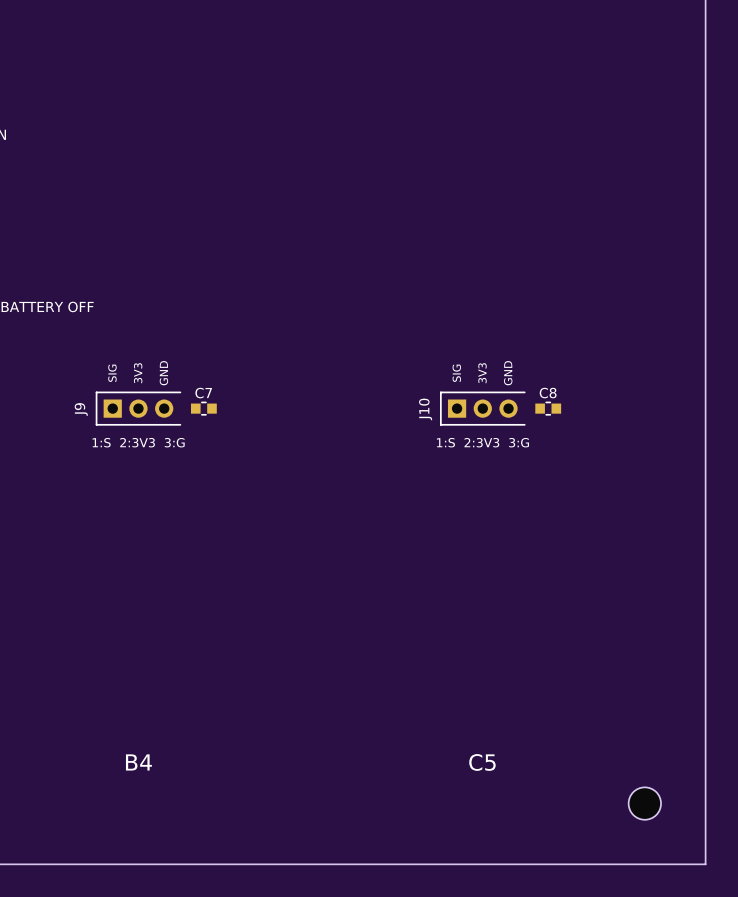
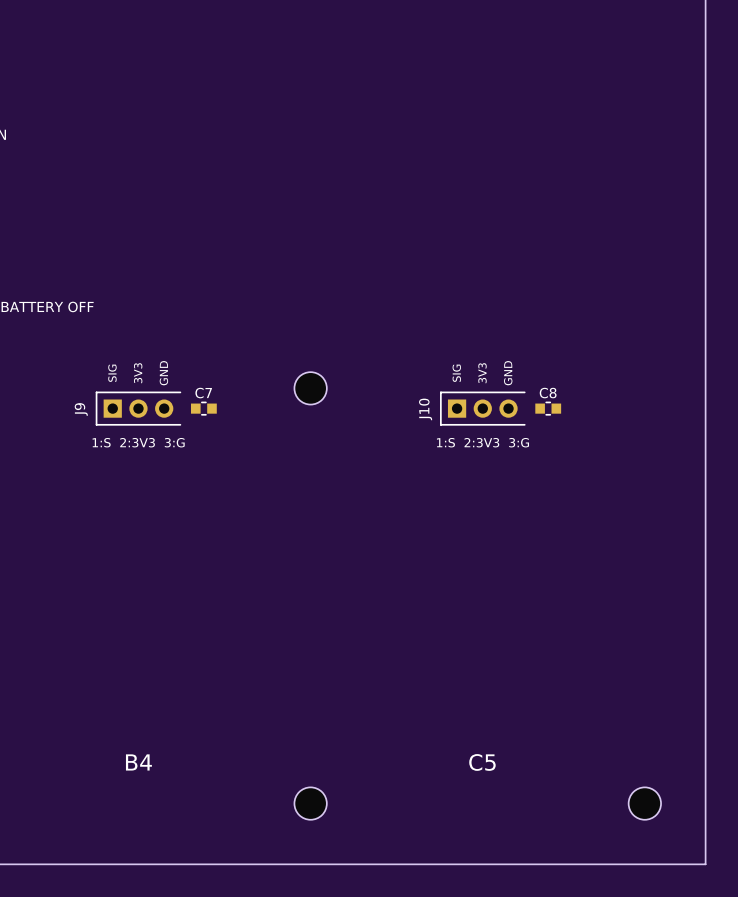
part: none -> (310, 388)
part: none -> (310, 803)

